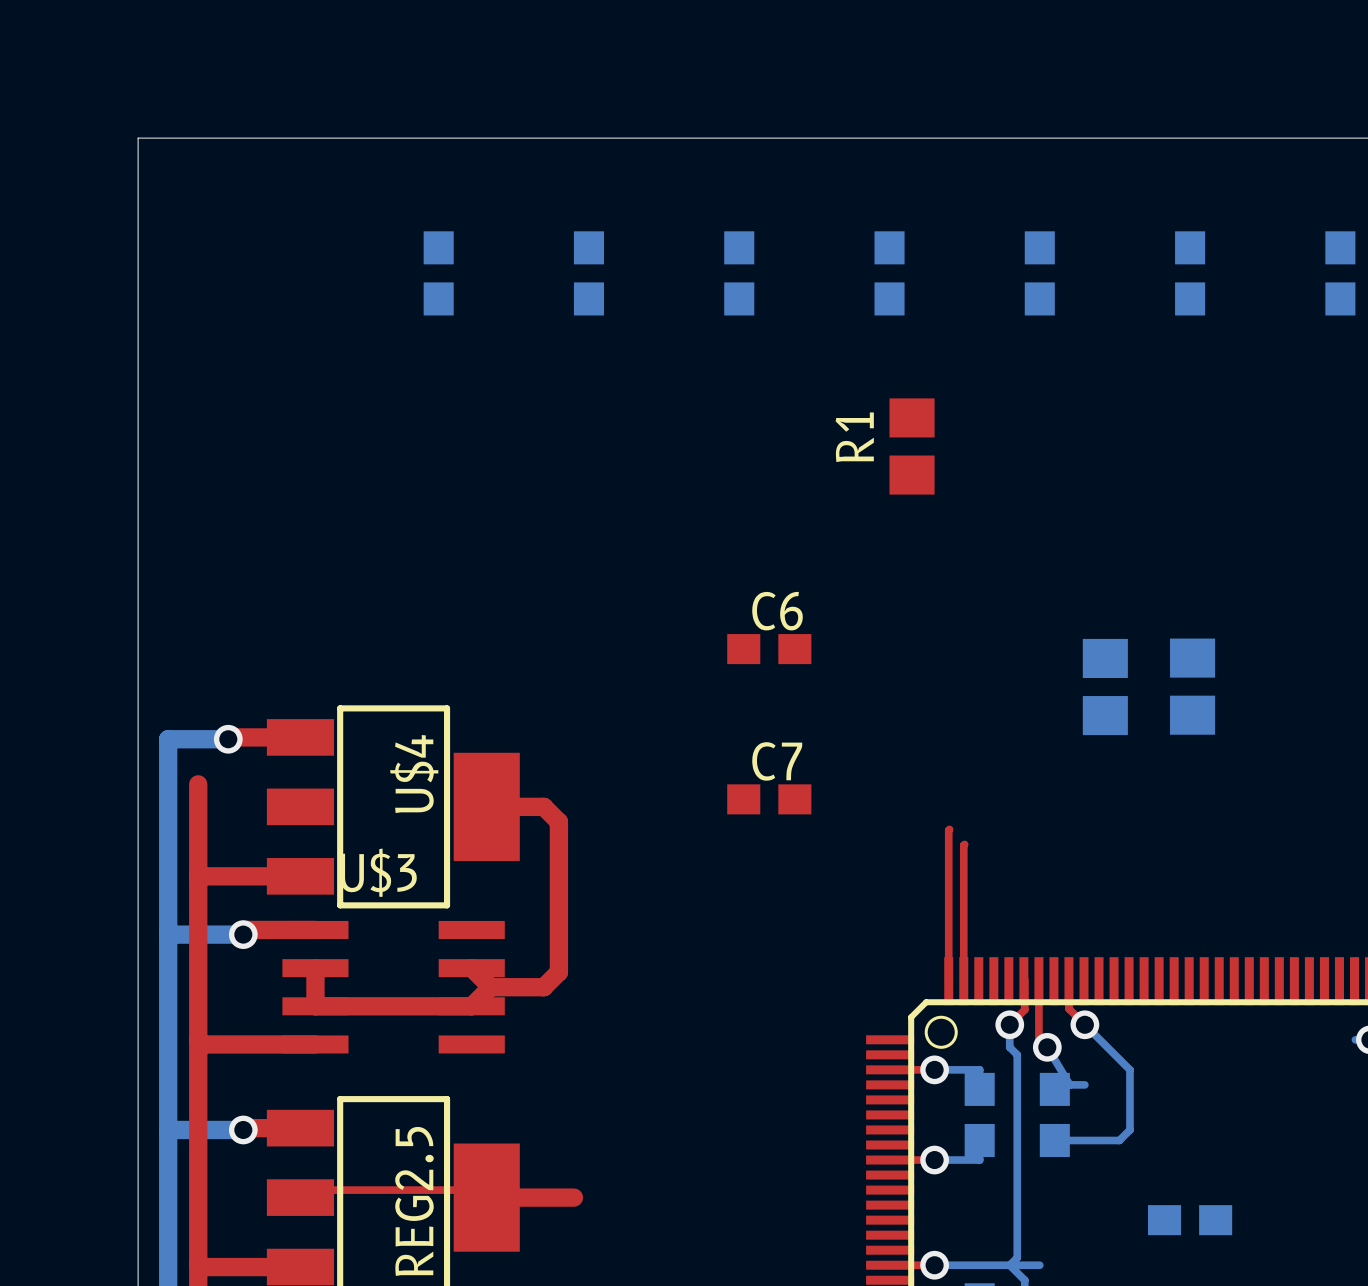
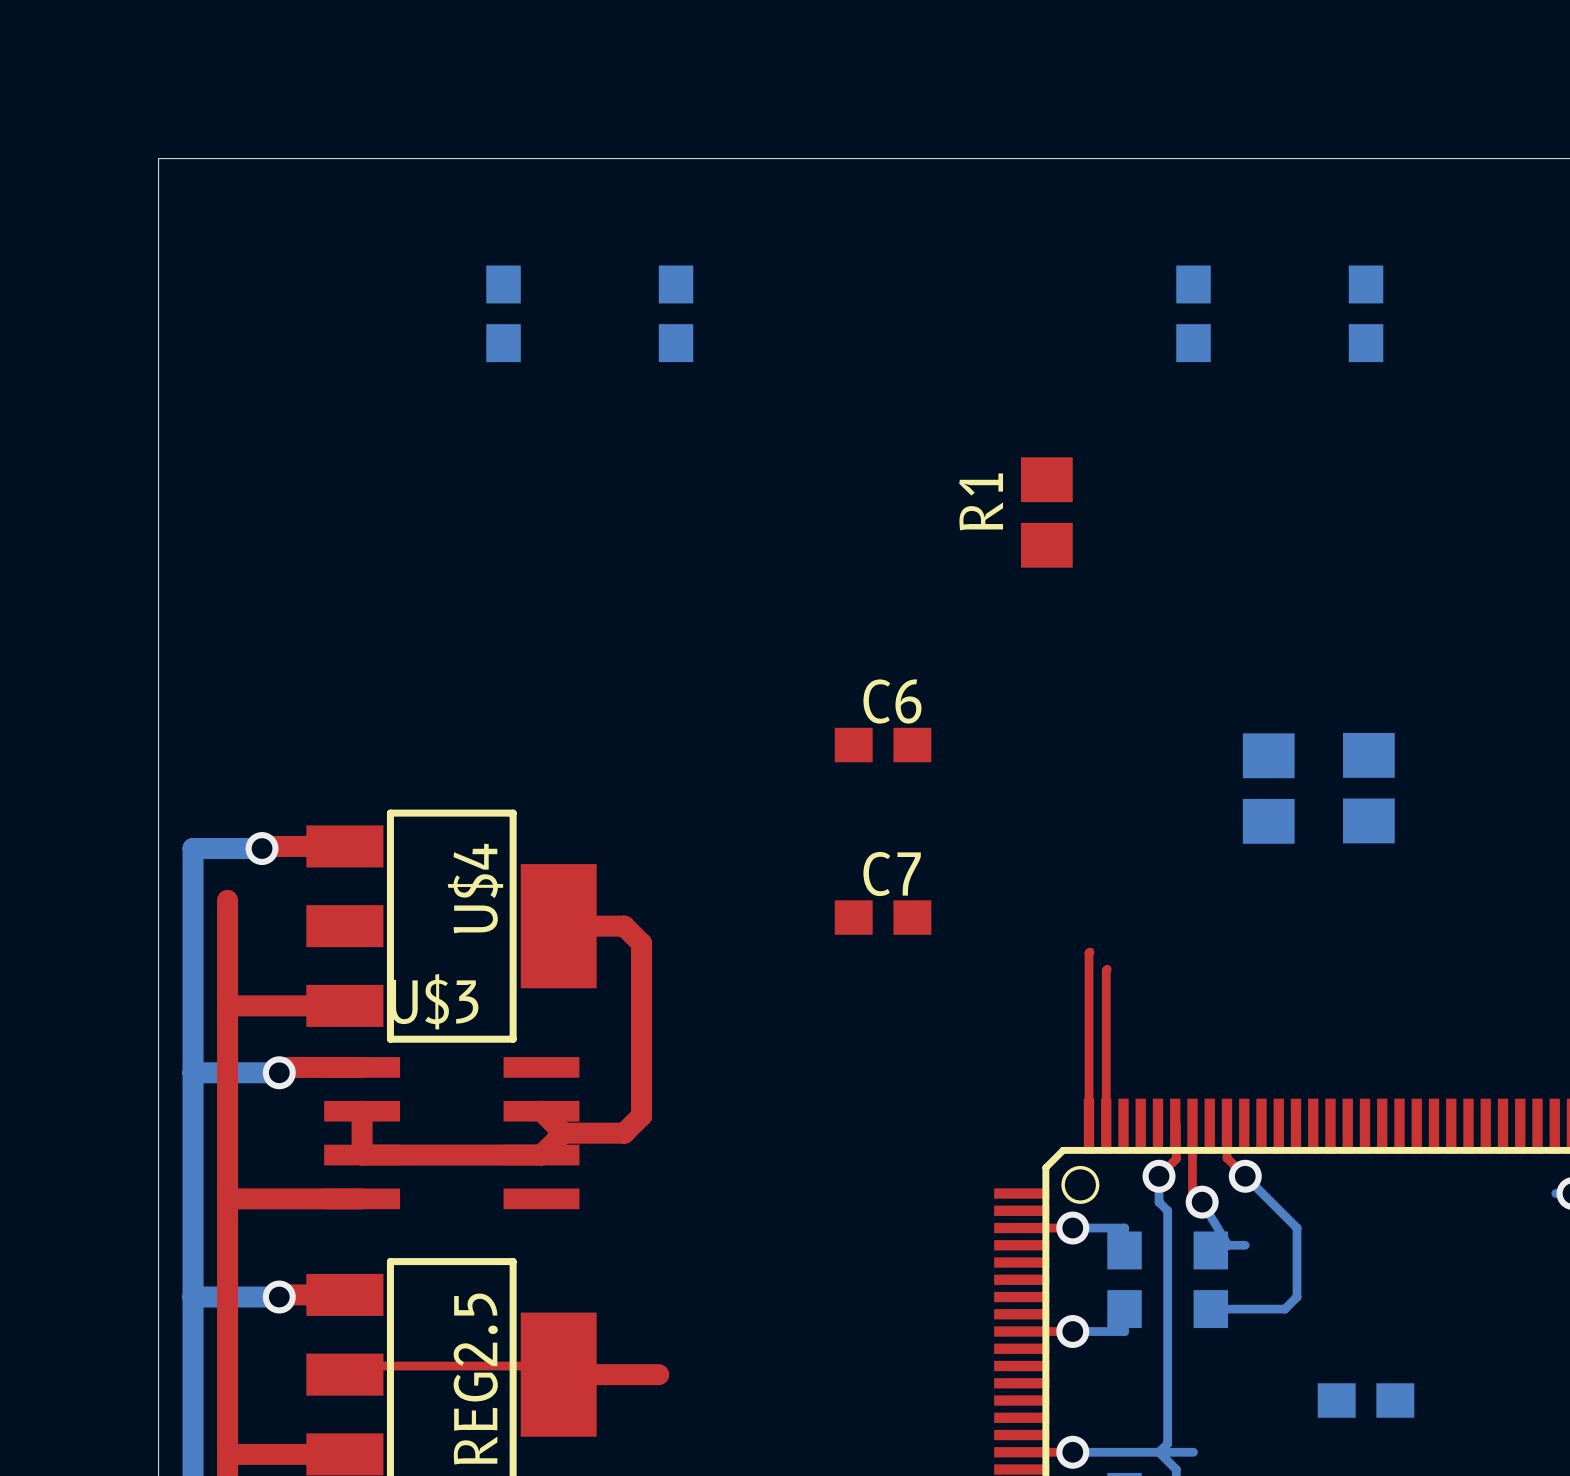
part: (739, 273) -> none
part: (889, 273) -> none
part: (1340, 273) -> none

